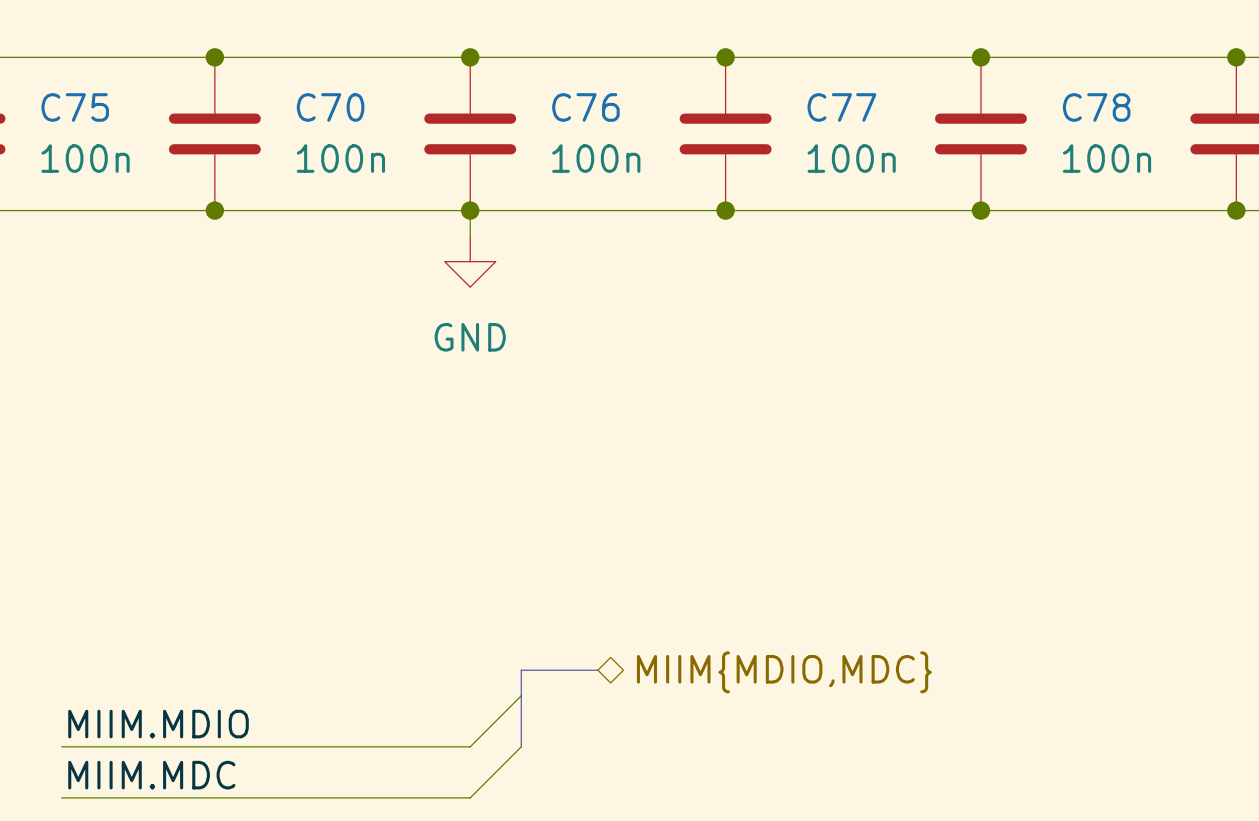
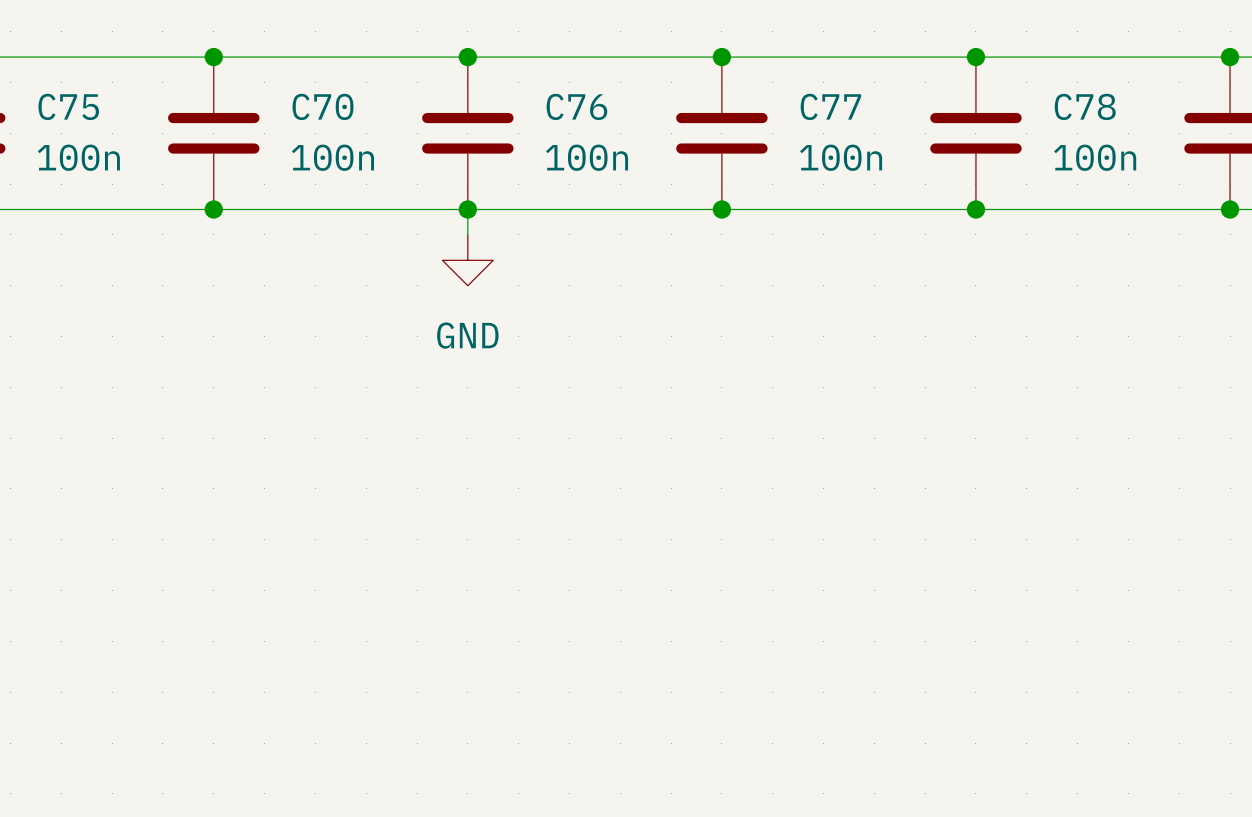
bus: (597, 670) (521, 670) (521, 746) -> none
hierarchical label: MIIM{MDIO,MDC} (784, 672) -> none
wire: (521, 695) (470, 746) (61, 746) -> none
label: MIIM.MDIO (158, 724) -> none
wire: (521, 746) (470, 797) (61, 797) -> none
label: MIIM.MDC (151, 775) -> none

